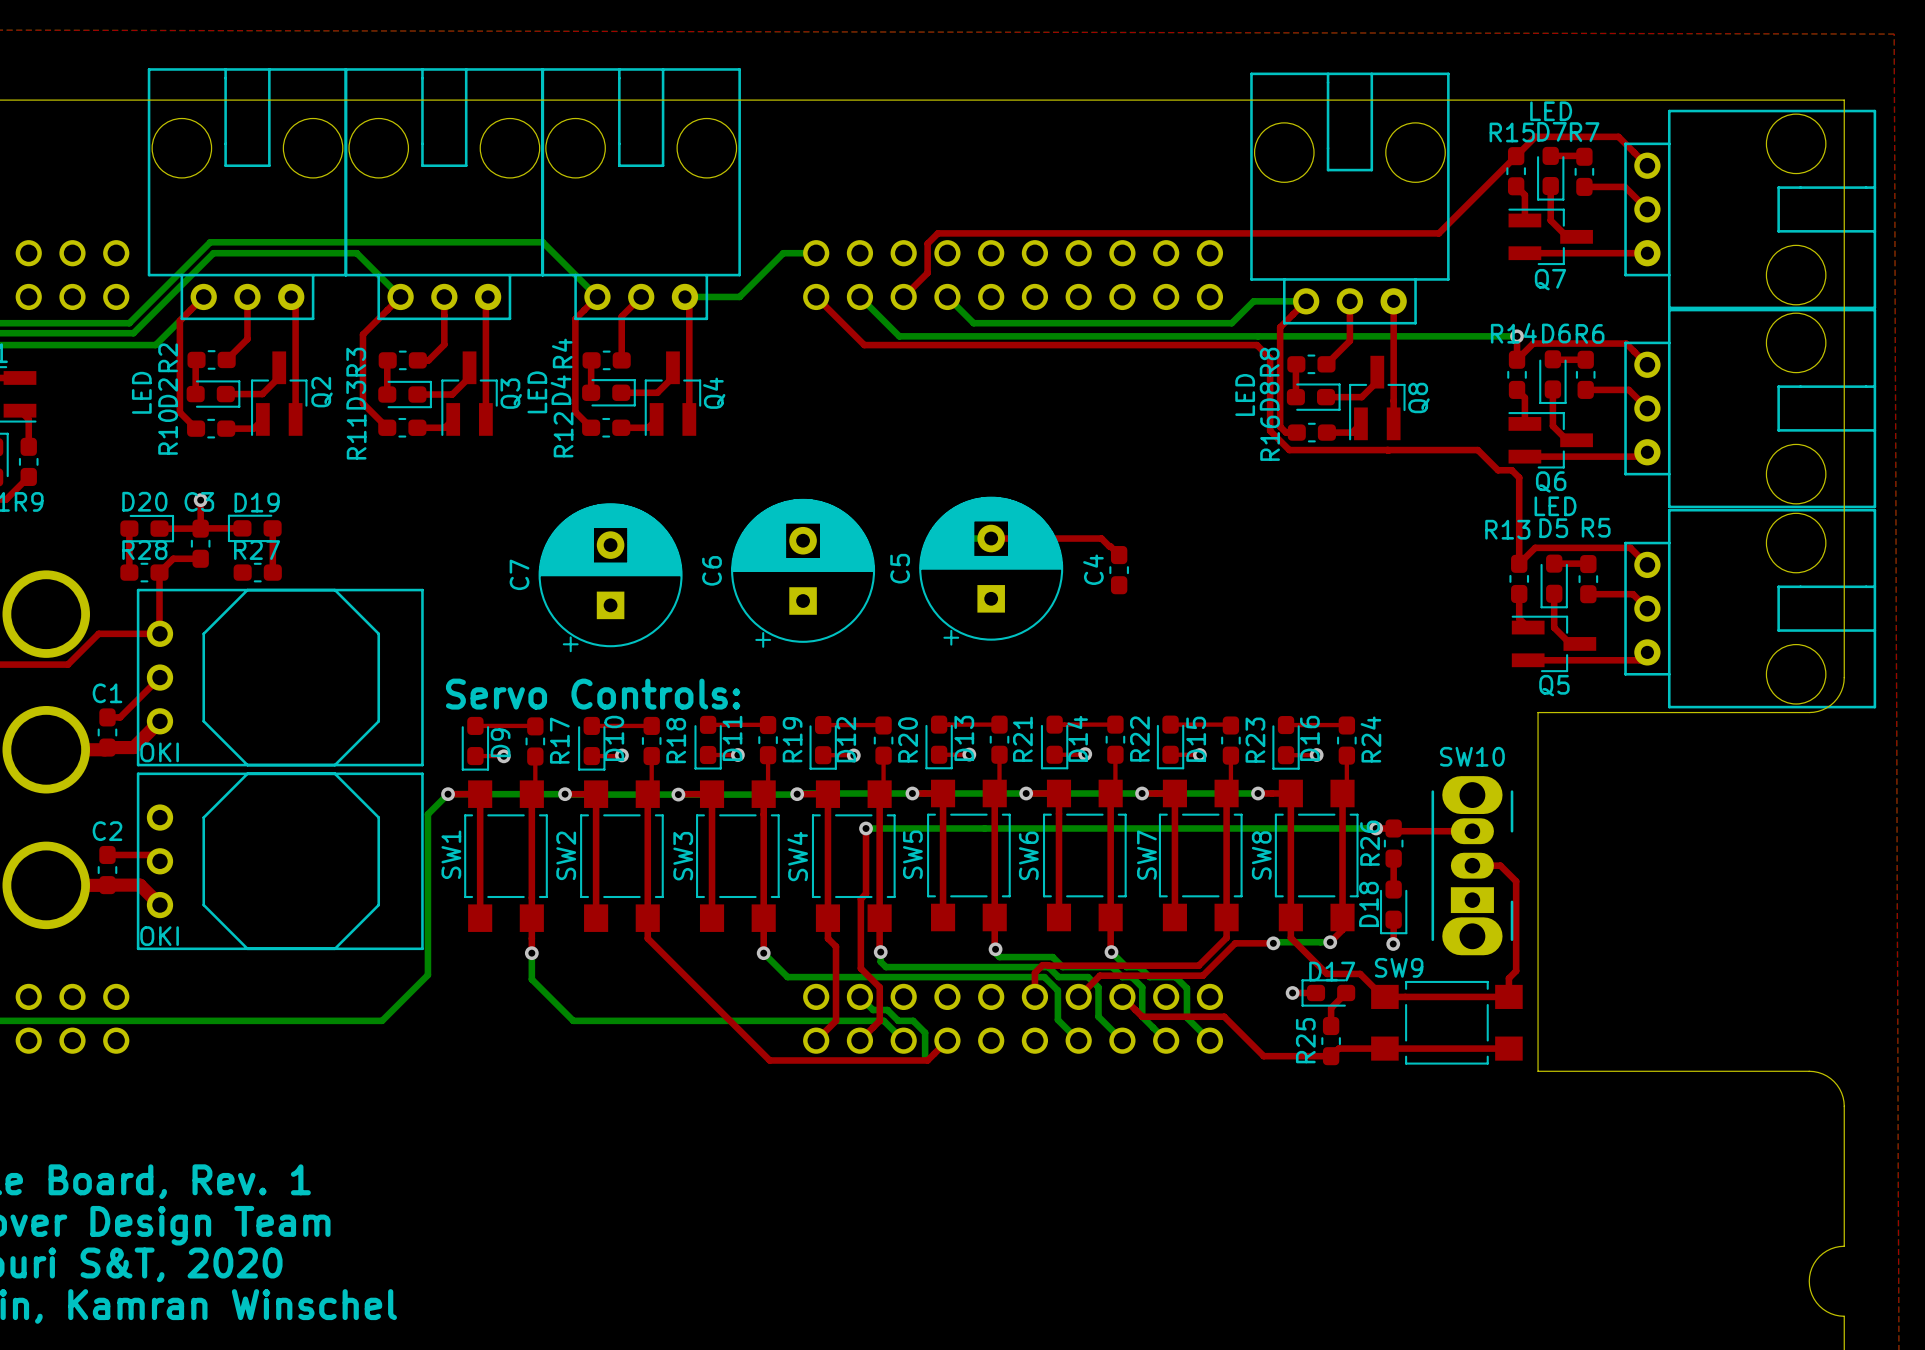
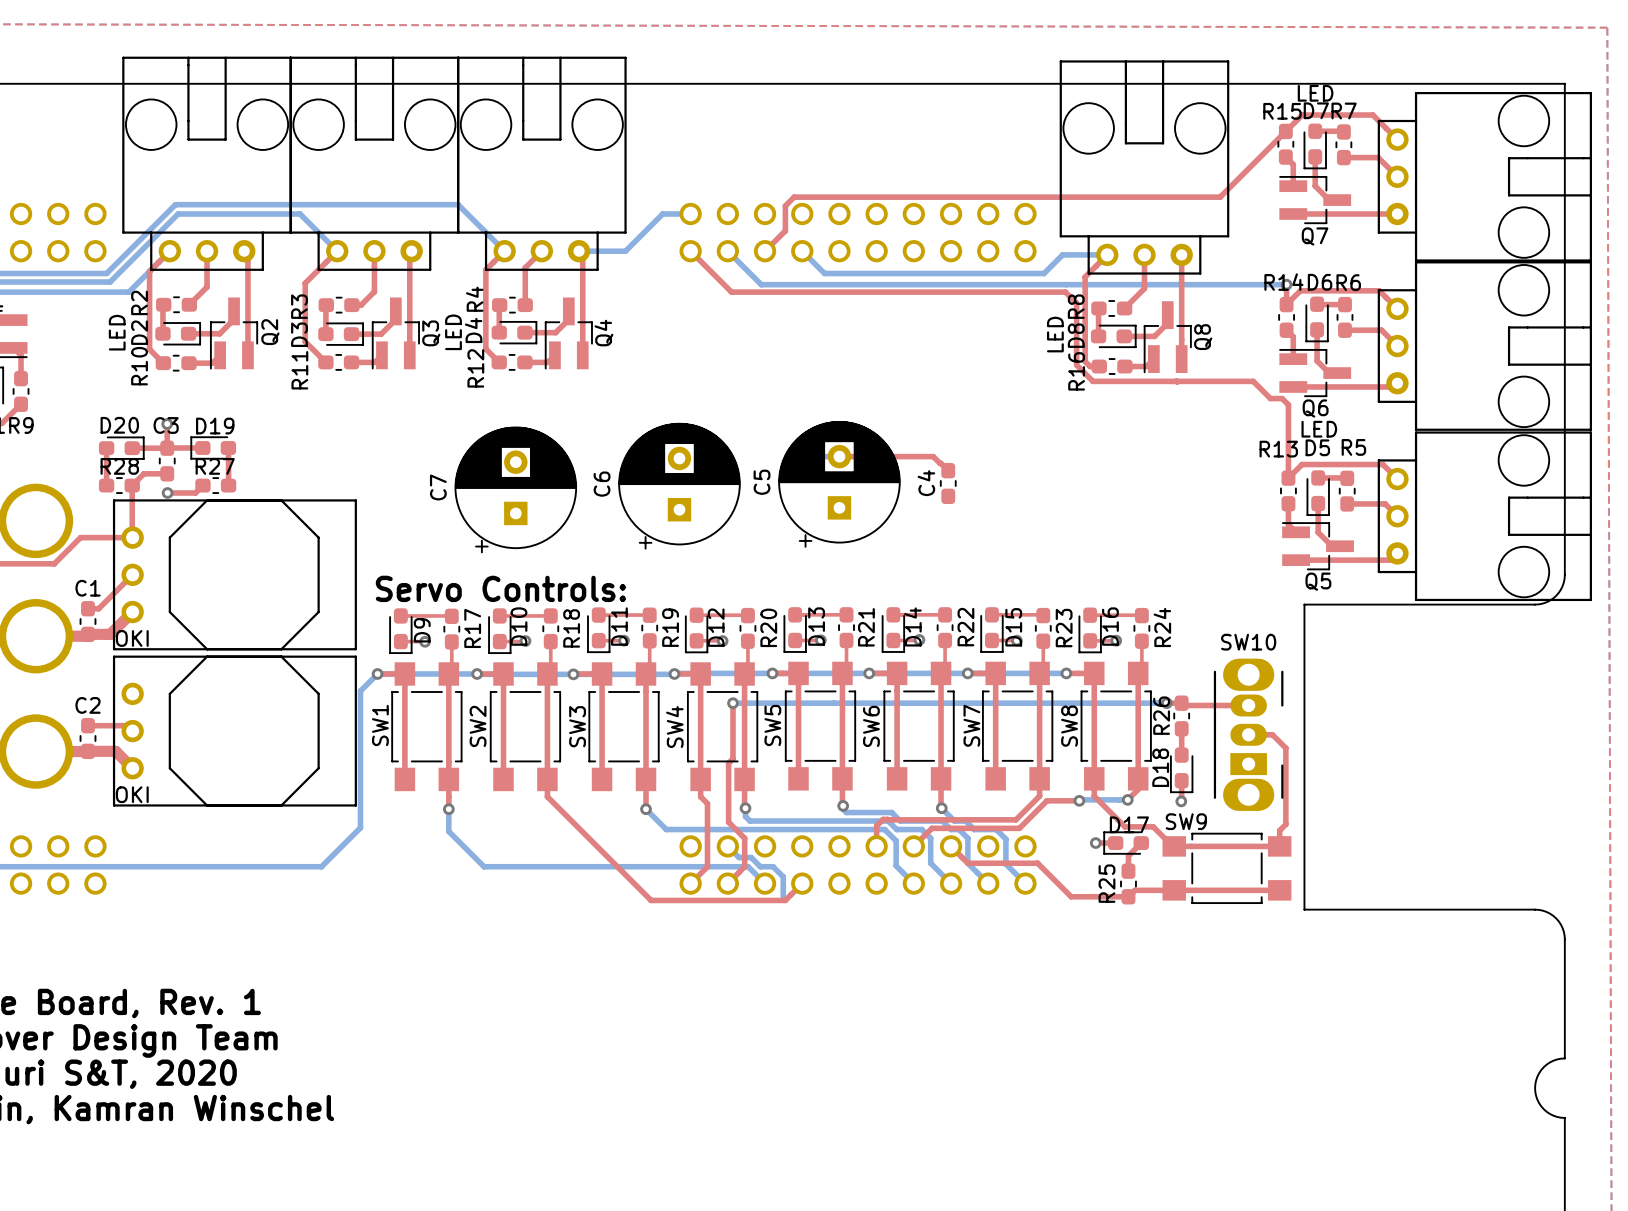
top track: none -> (202, 485) (195, 492) (167, 492)
via: none -> (167, 492)

